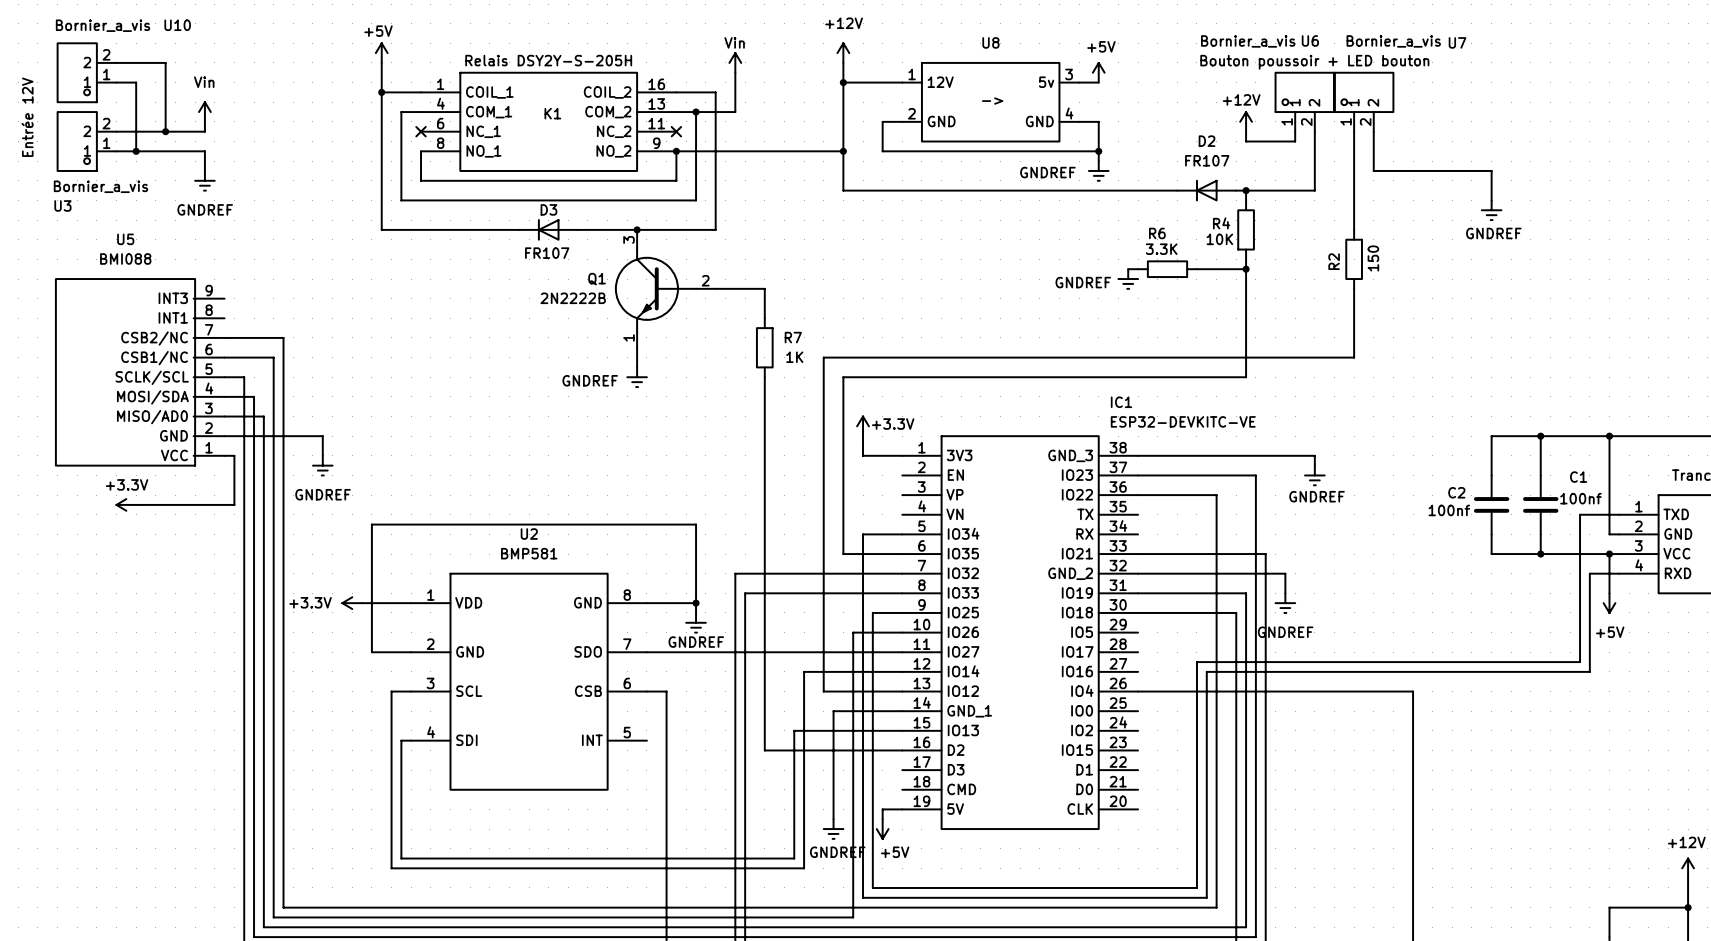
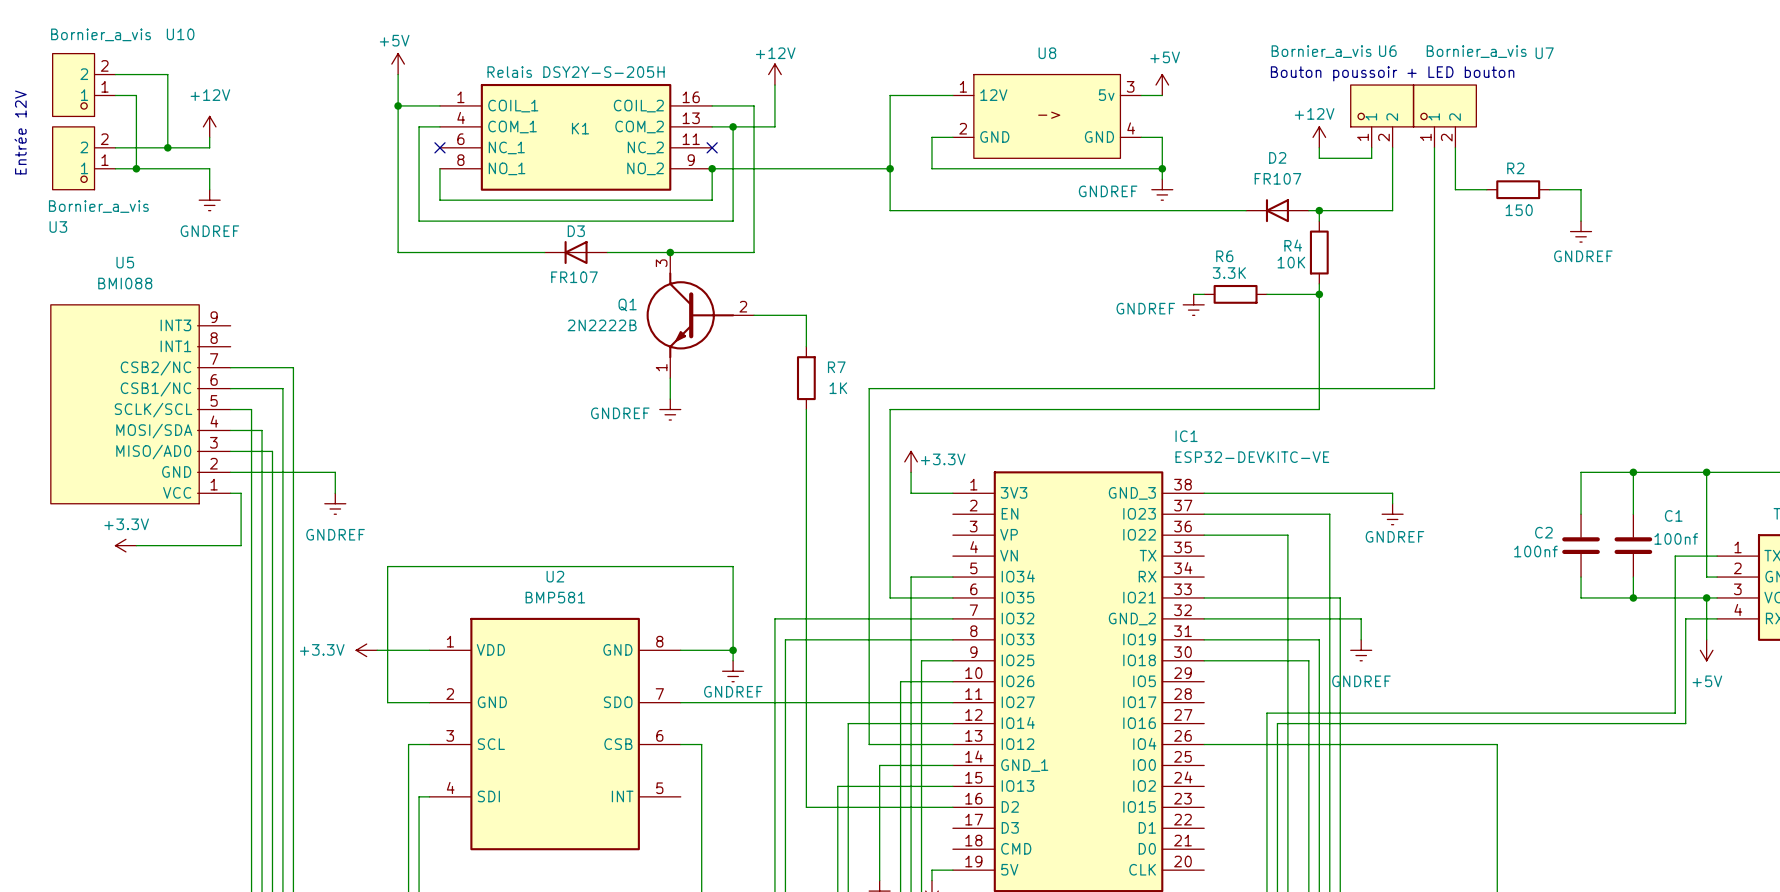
power symbol: +12V (843, 53) -> none
power symbol: Vin (735, 62) -> +12V (774, 74)
wire: (843, 62) (843, 82) -> none
junction: (843, 82) -> none
power symbol: Vin (204, 112) -> +12V (209, 126)
wire: (1403, 170) (1462, 170) -> none
wire: none -> (1434, 252) (1434, 315)
R2 rotation: 0° (1354, 259) -> 90° clockwise (1518, 189)
R2 position: (1354, 259) -> (1518, 189)

